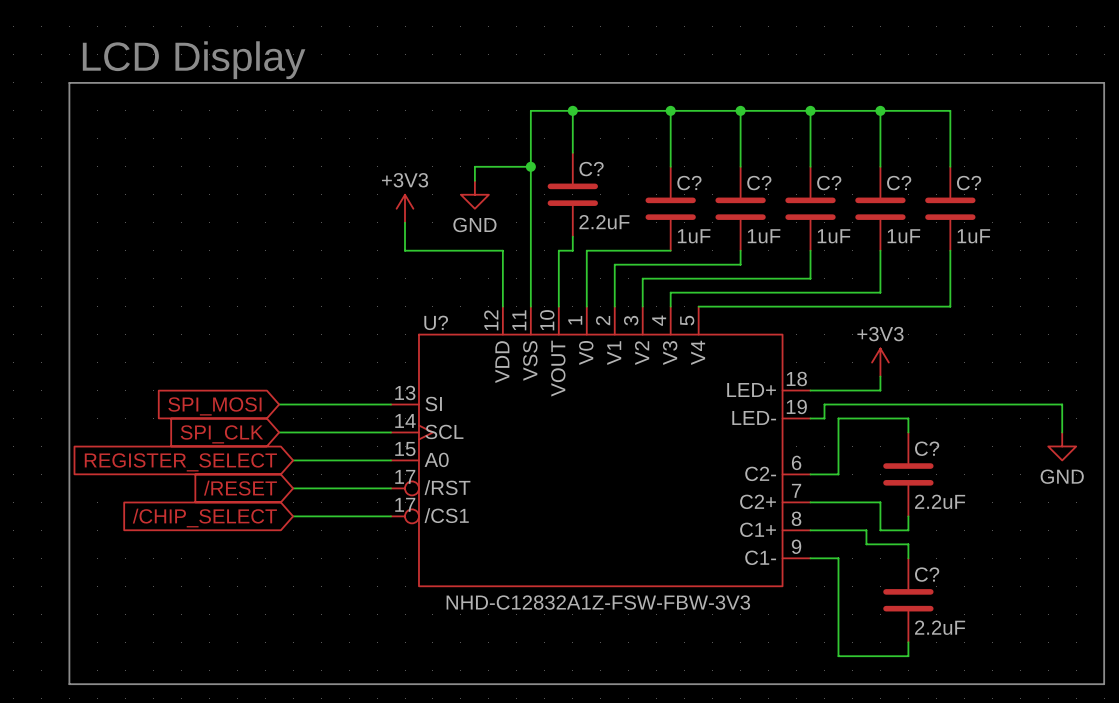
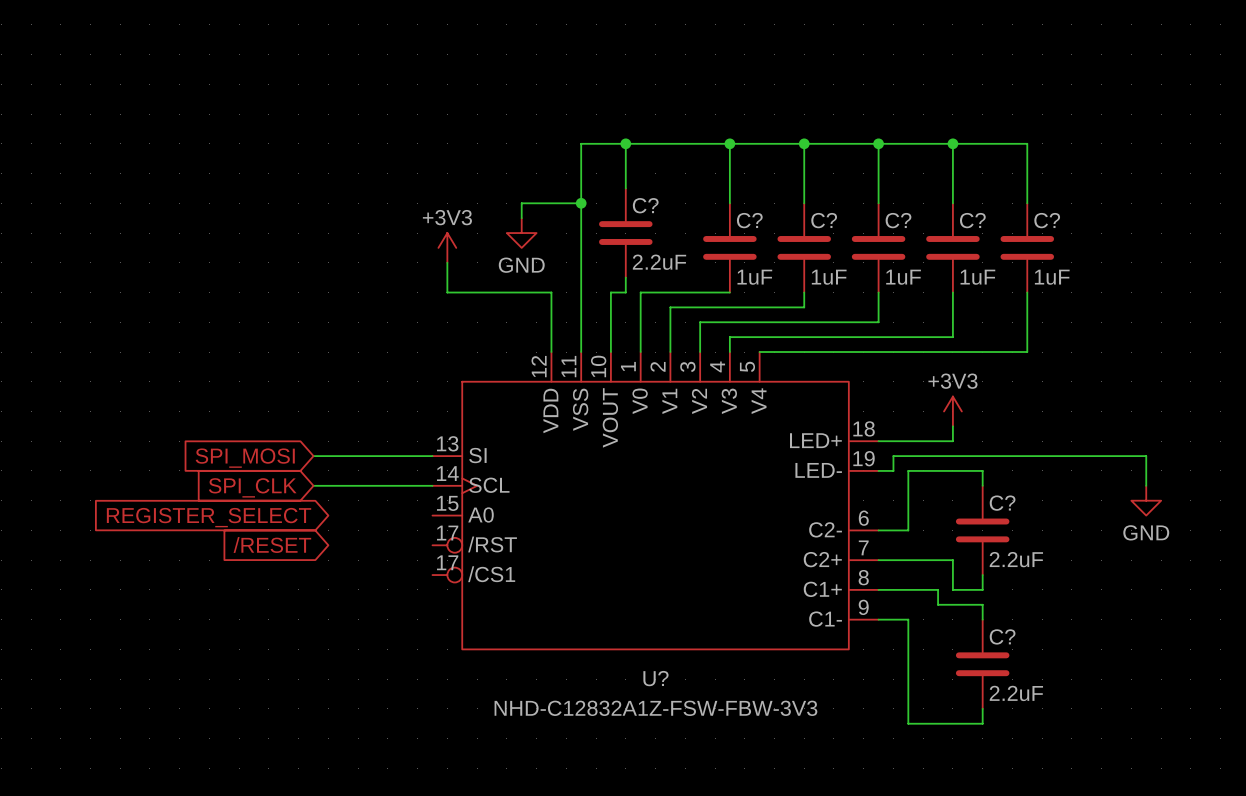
text: LCD Display (194, 60) -> none
line: (69, 82) (1104, 82) (1104, 684) (69, 684) (69, 82) -> none
U? name position: U? (436, 322) -> U? (655, 678)
wire: (293, 460) (391, 460) -> none
wire: (293, 488) (391, 488) -> none
wire: (293, 516) (391, 516) -> none
global label: /CHIP_SELECT (204, 518) -> none
U? value position: NHD-C12832A1Z-FSW-FBW-3V3 (598, 602) -> NHD-C12832A1Z-FSW-FBW-3V3 (655, 708)

